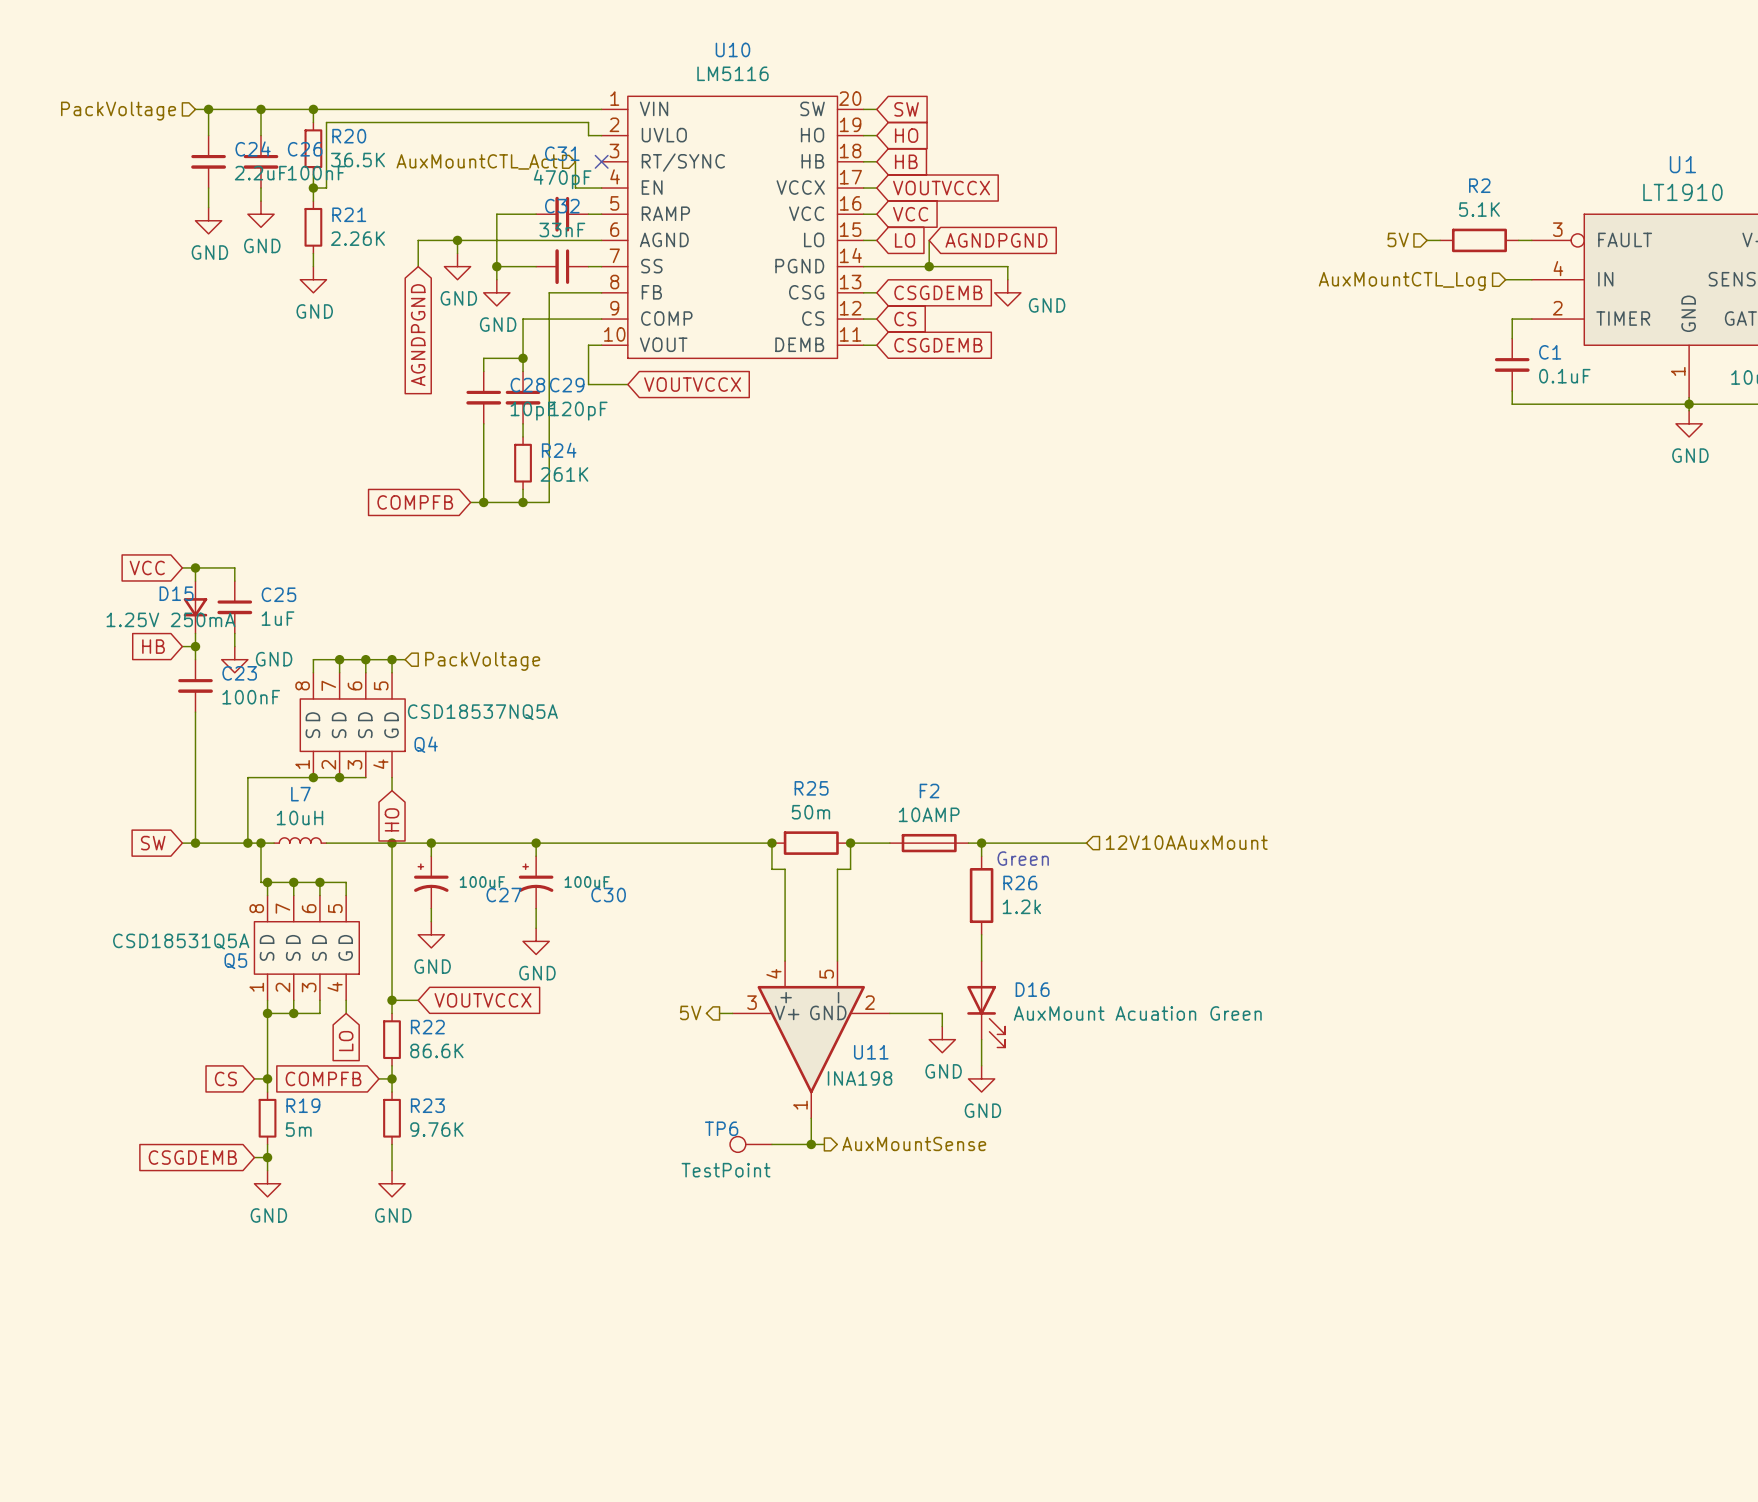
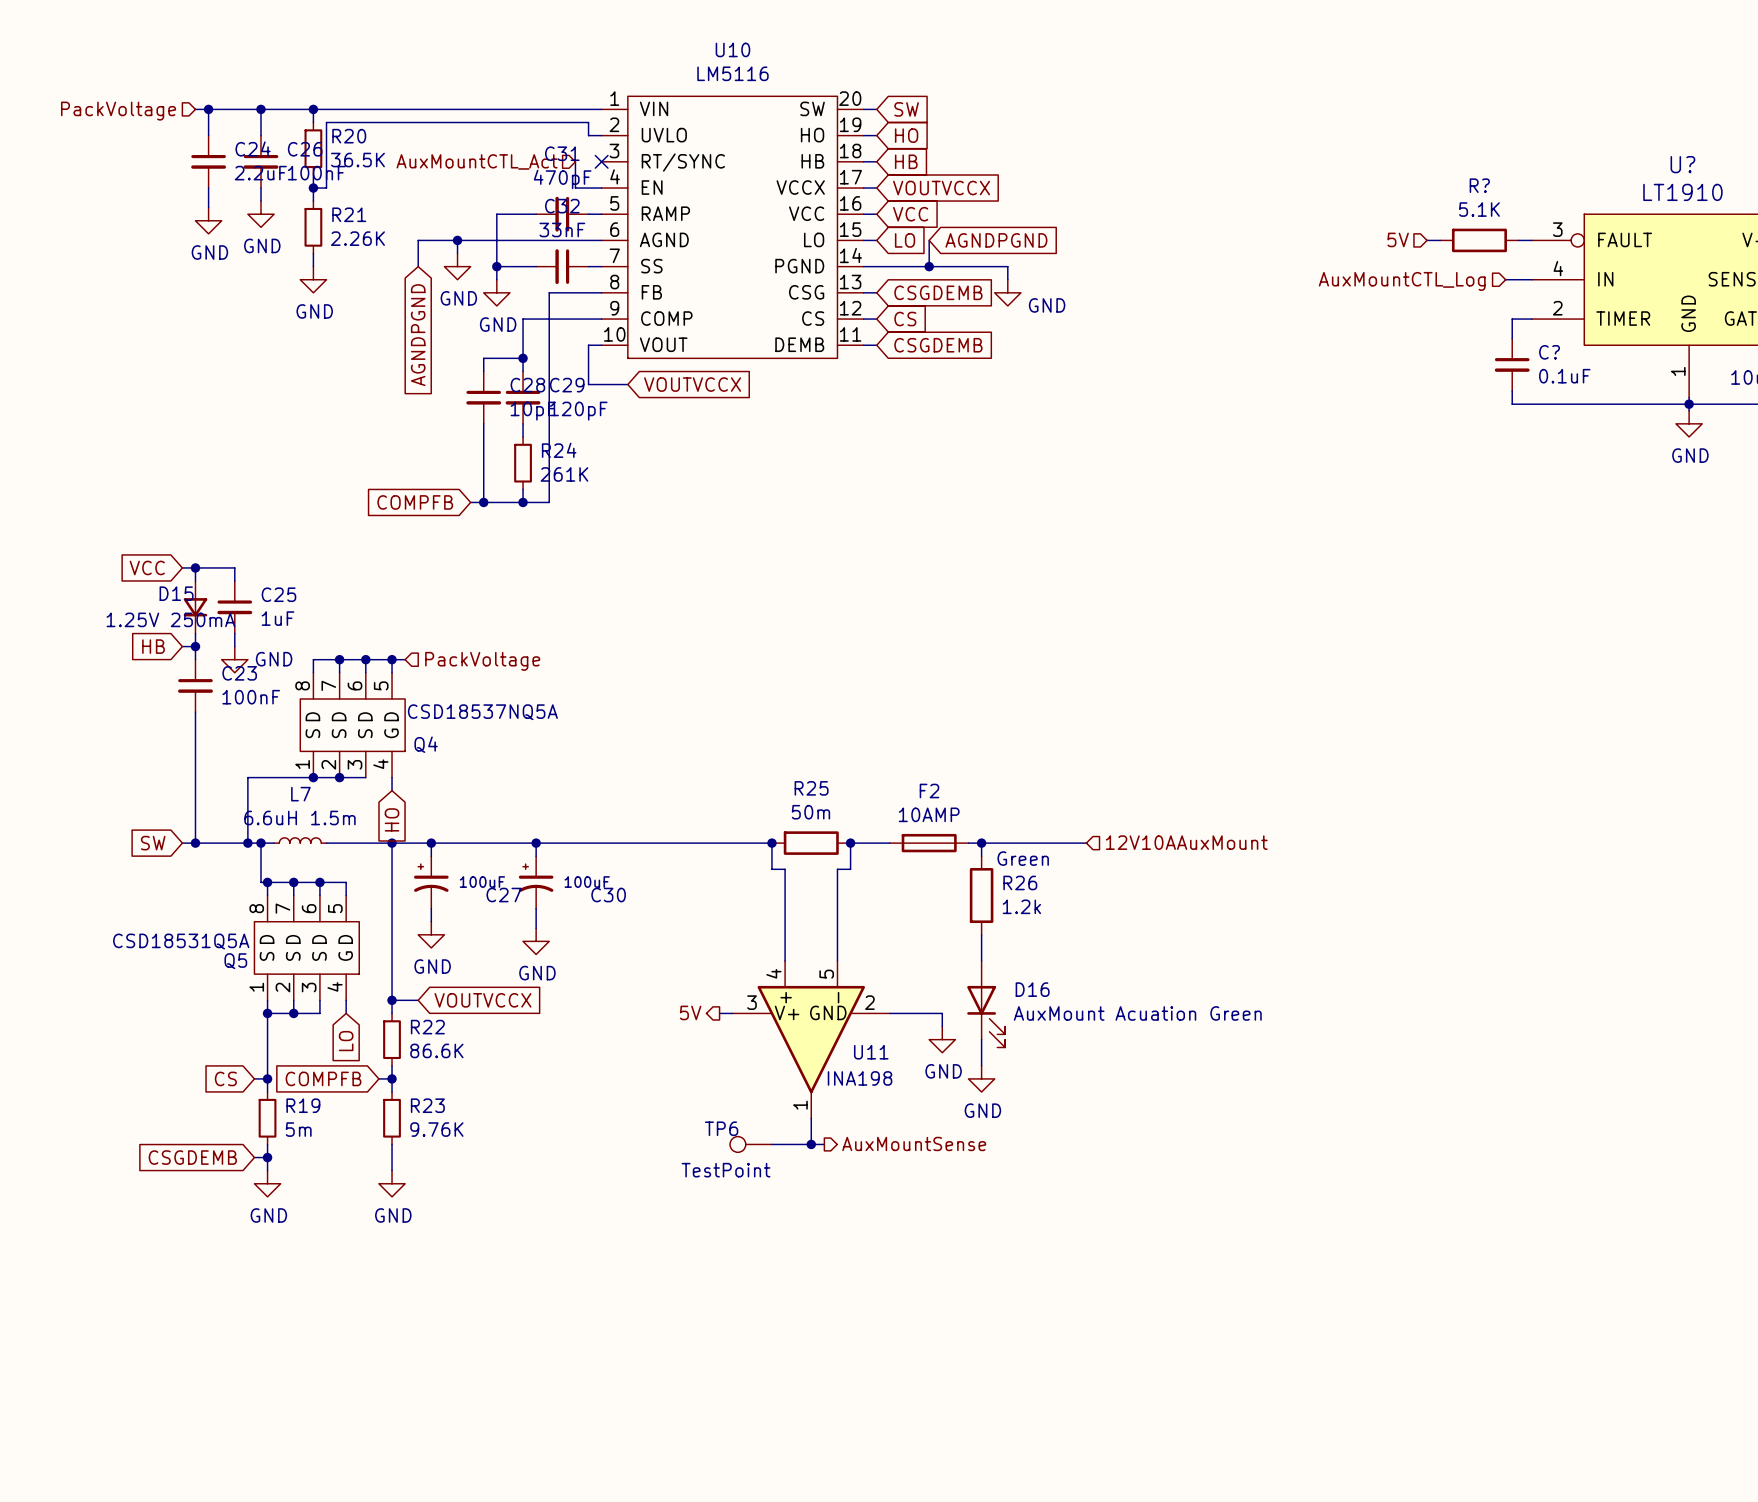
U1 name: U1 (1682, 164) -> U? (1682, 164)
R2 name: R2 (1479, 185) -> R? (1479, 185)
C1 name: C1 (1550, 352) -> C? (1549, 352)
L7 value: 10uH (299, 817) -> 6.6uH 1.5m (299, 817)

